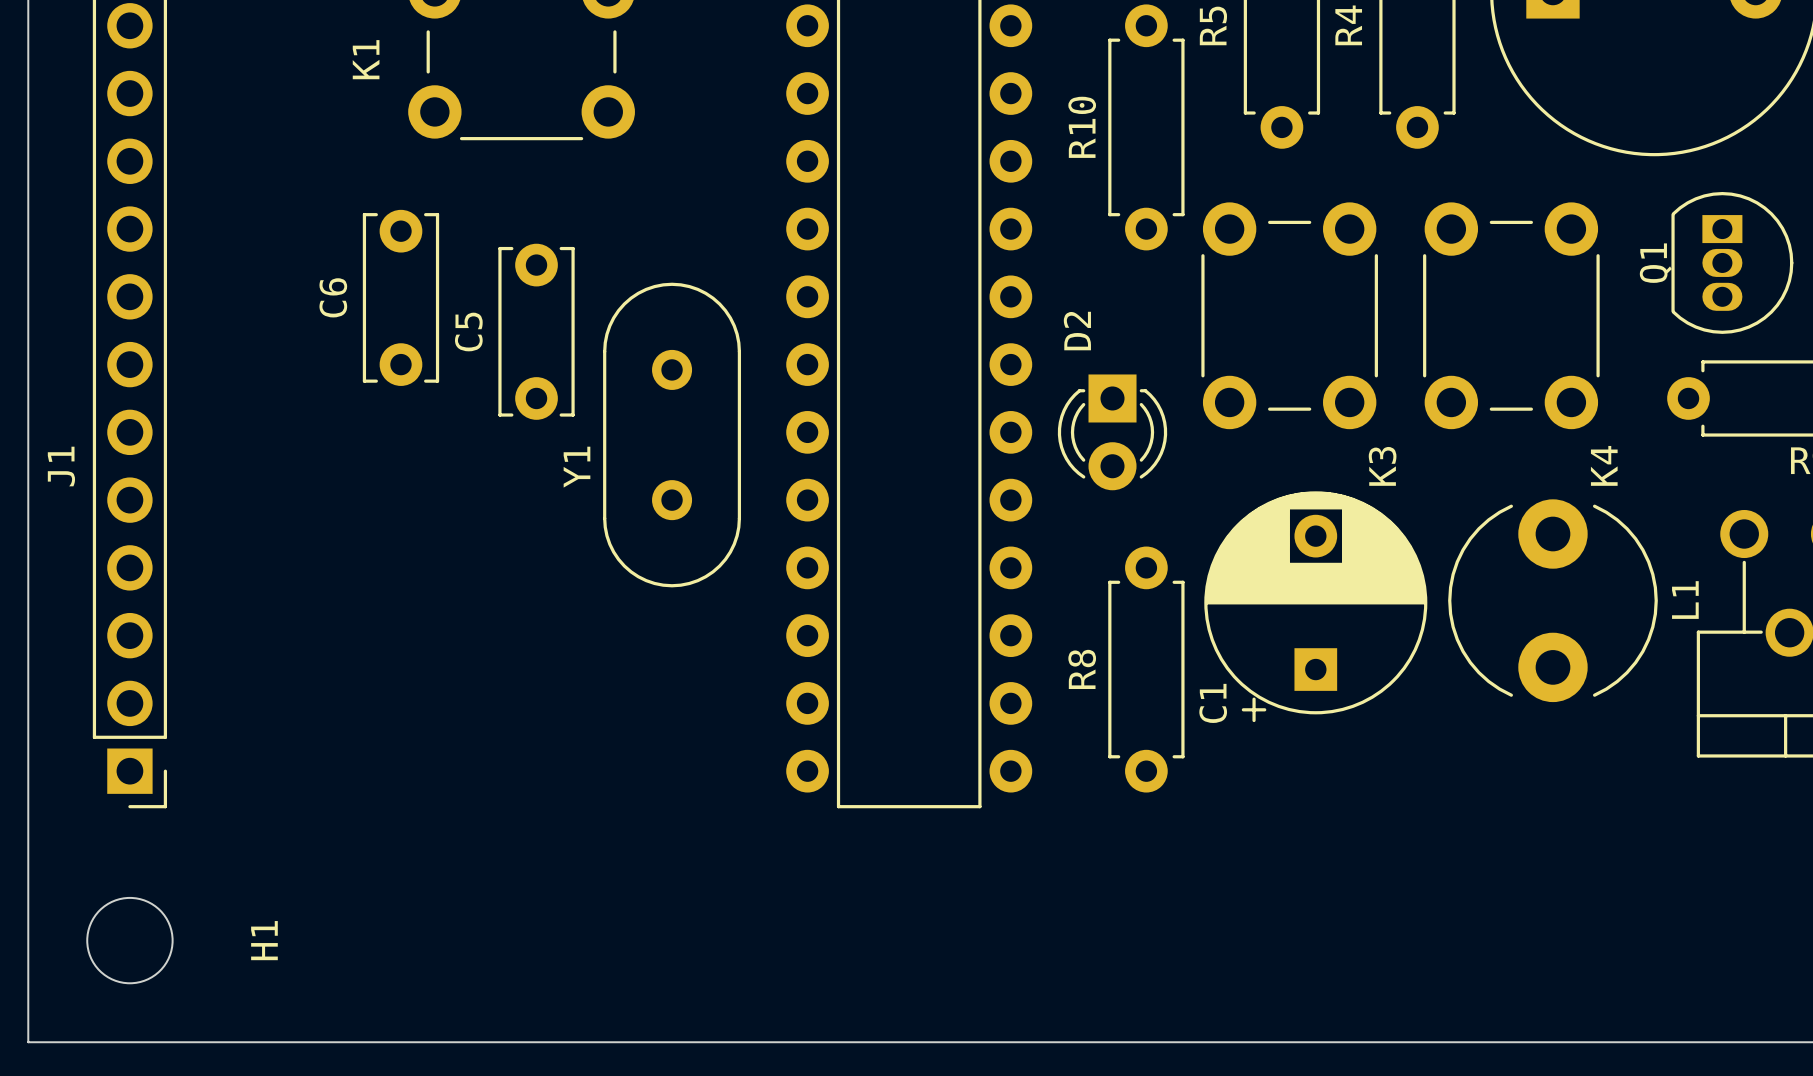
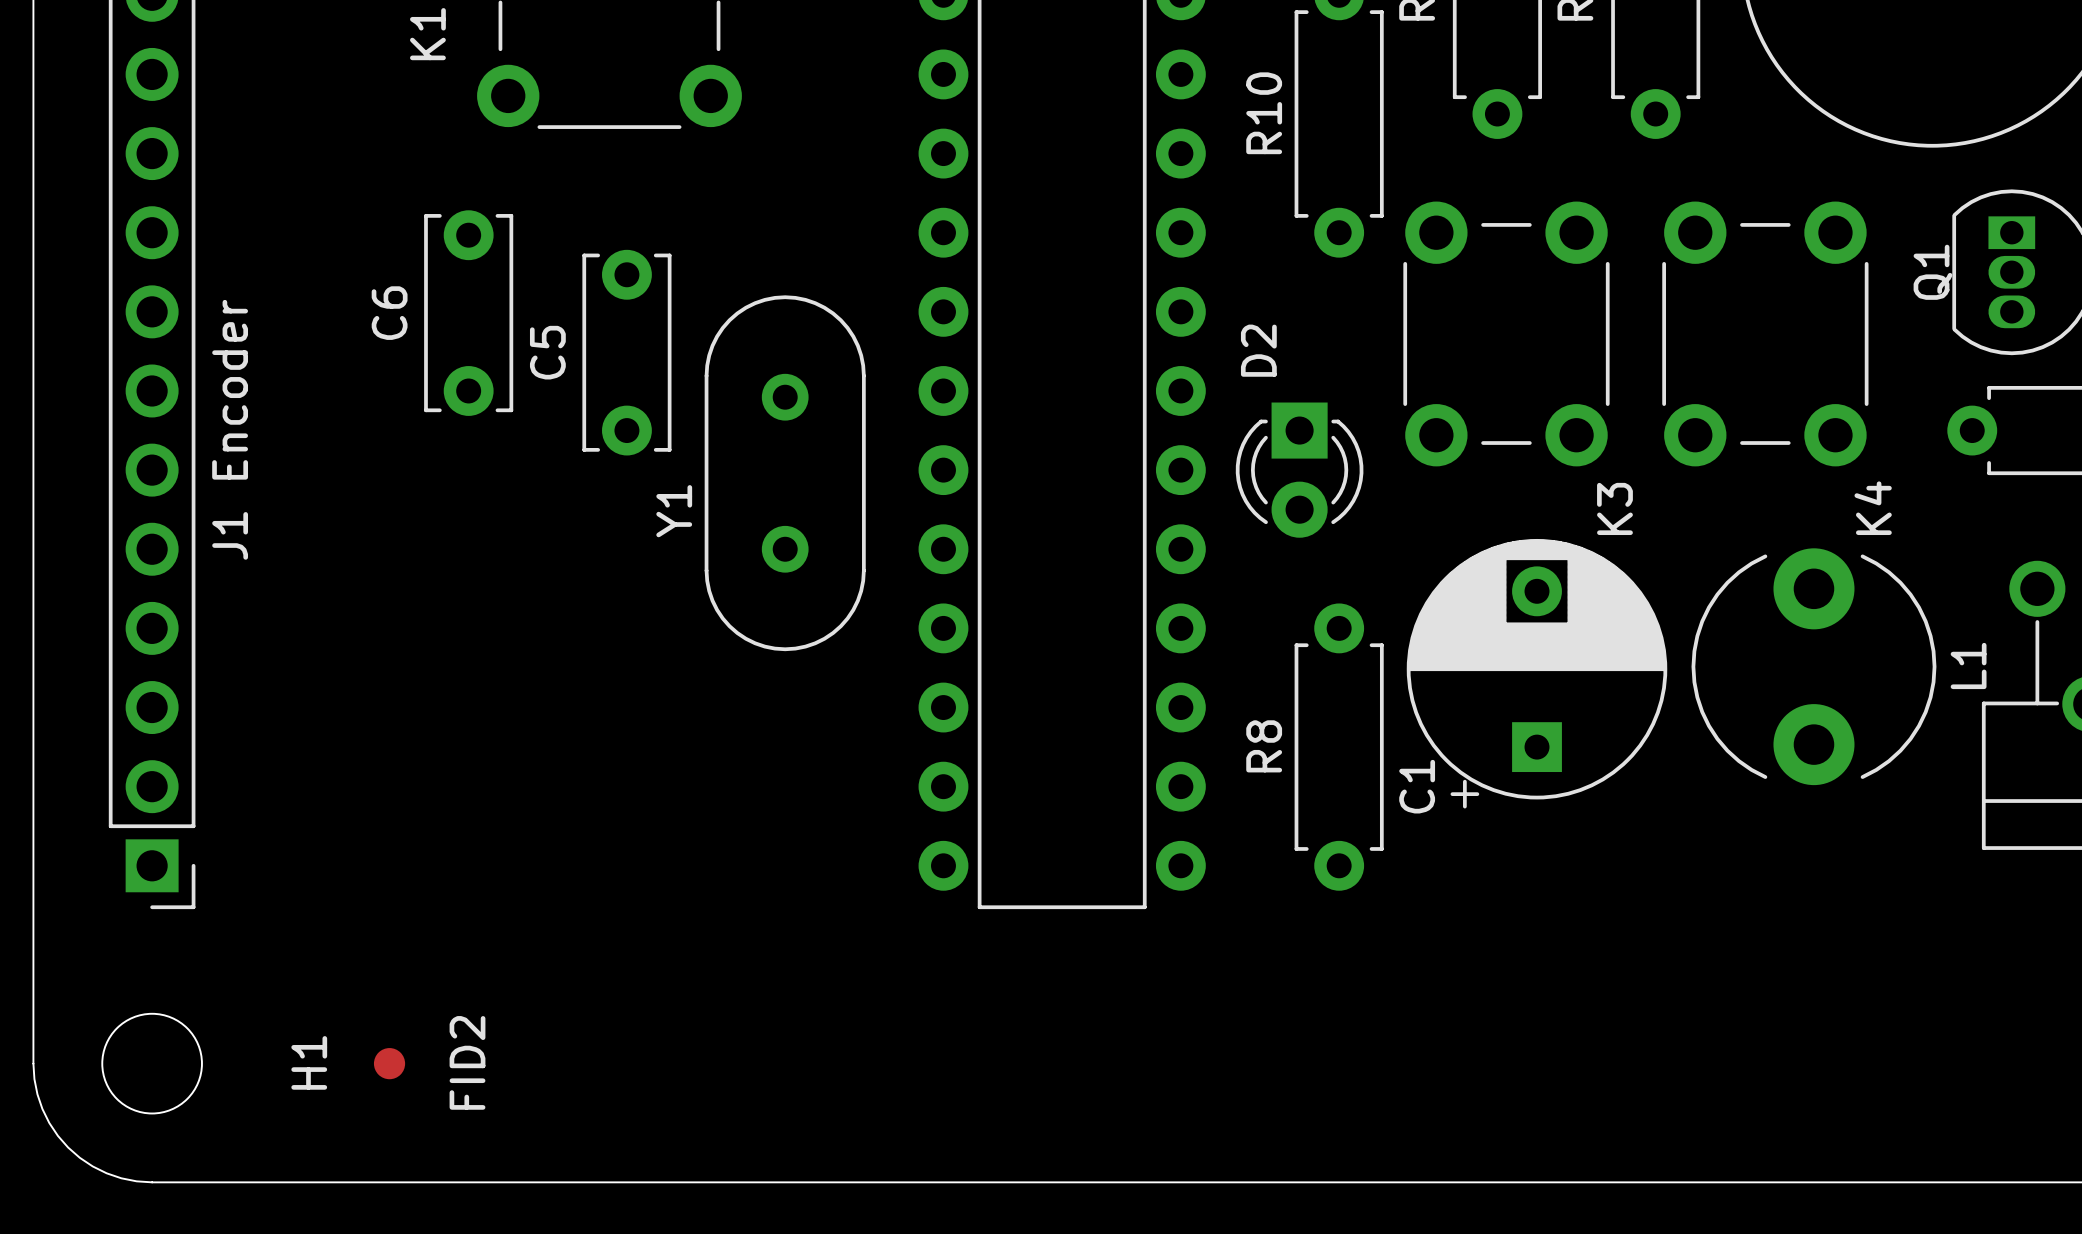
J1 name: J1 (61, 466) -> J1 Encoder (230, 429)
board edge: (28, 940) (28, 1042) (129, 1042) -> (33, 1063) (34, 1079) (42, 1109) (49, 1122) (68, 1147) (92, 1166) (106, 1173) (136, 1181) (152, 1182)
FID2: none -> (389, 1063)

